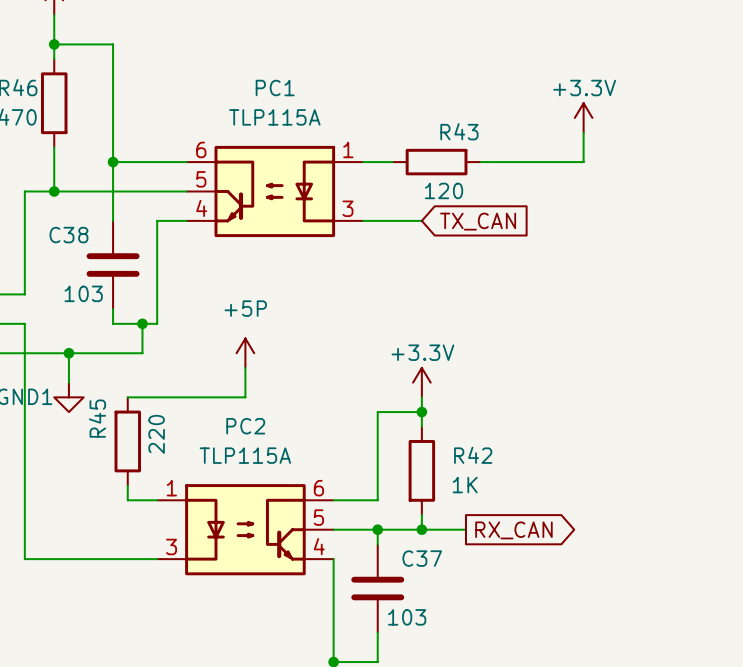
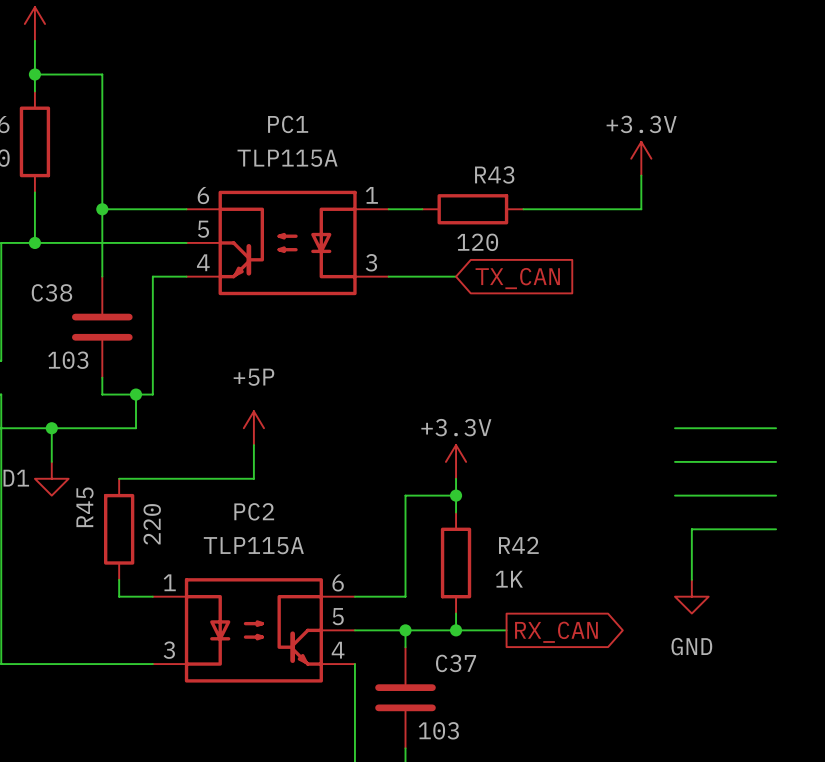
wire: none -> (675, 428) (776, 428)
wire: none -> (675, 461) (776, 461)
wire: none -> (675, 495) (776, 495)
wire: none -> (776, 529) (691, 529) (691, 579)
power symbol: none -> GND (691, 596)

